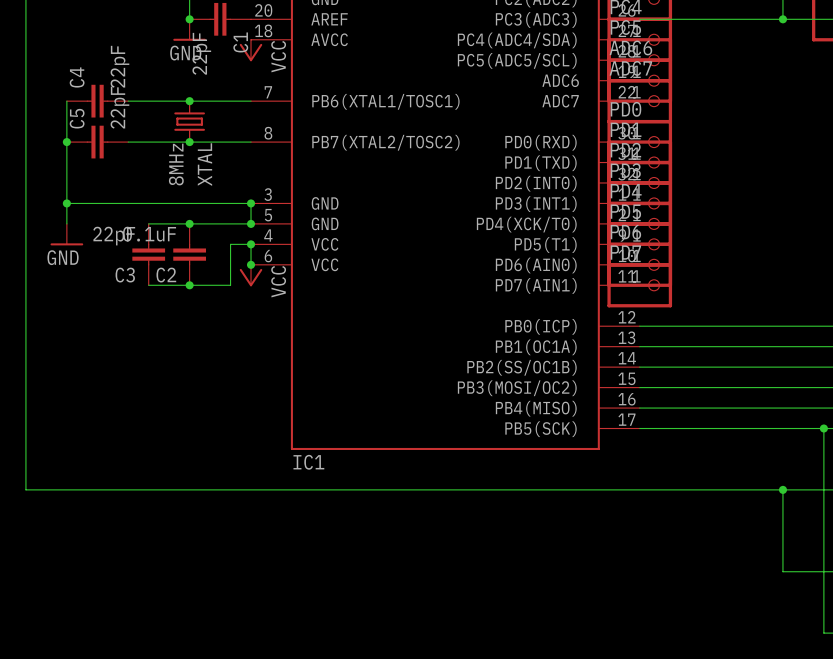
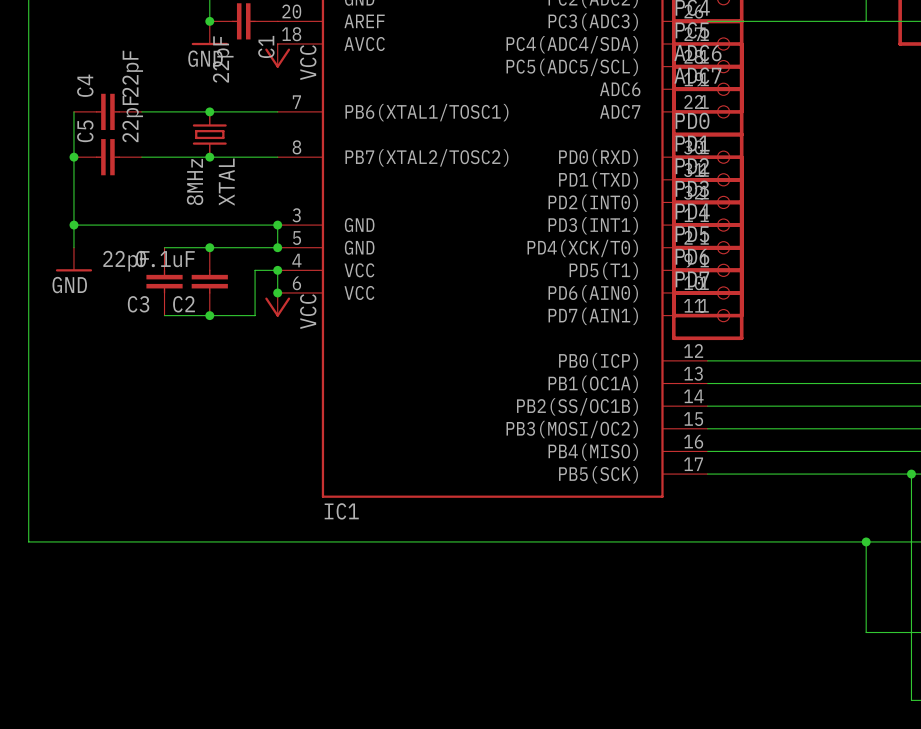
junction: (782, 19) -> none

